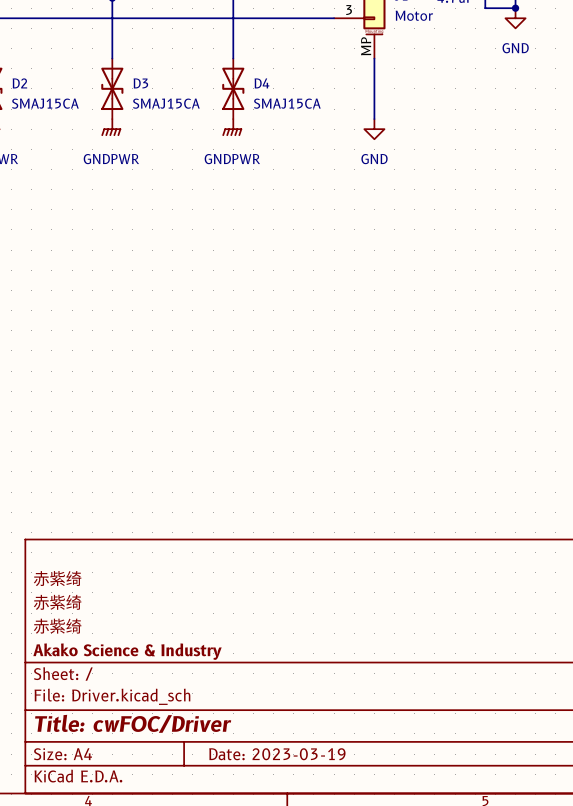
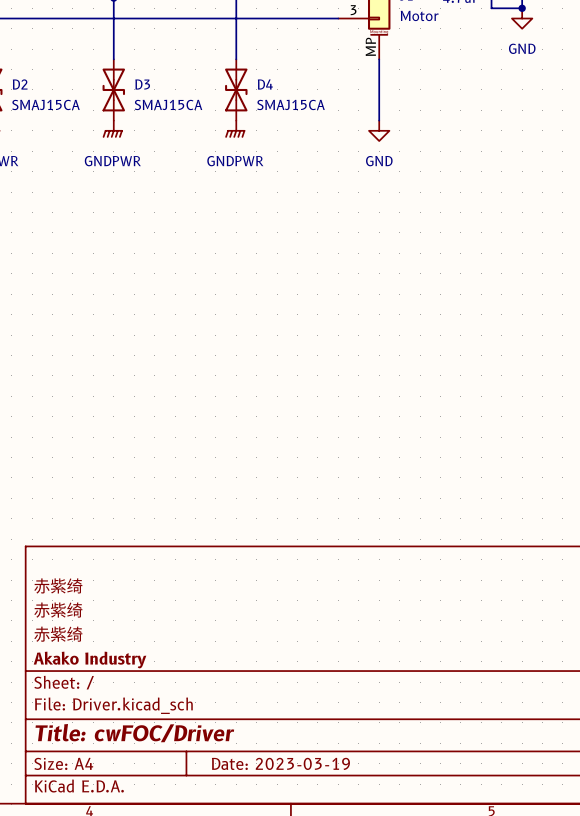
title block: Akako Science & Industry (127, 651) -> Akako Industry (90, 660)

